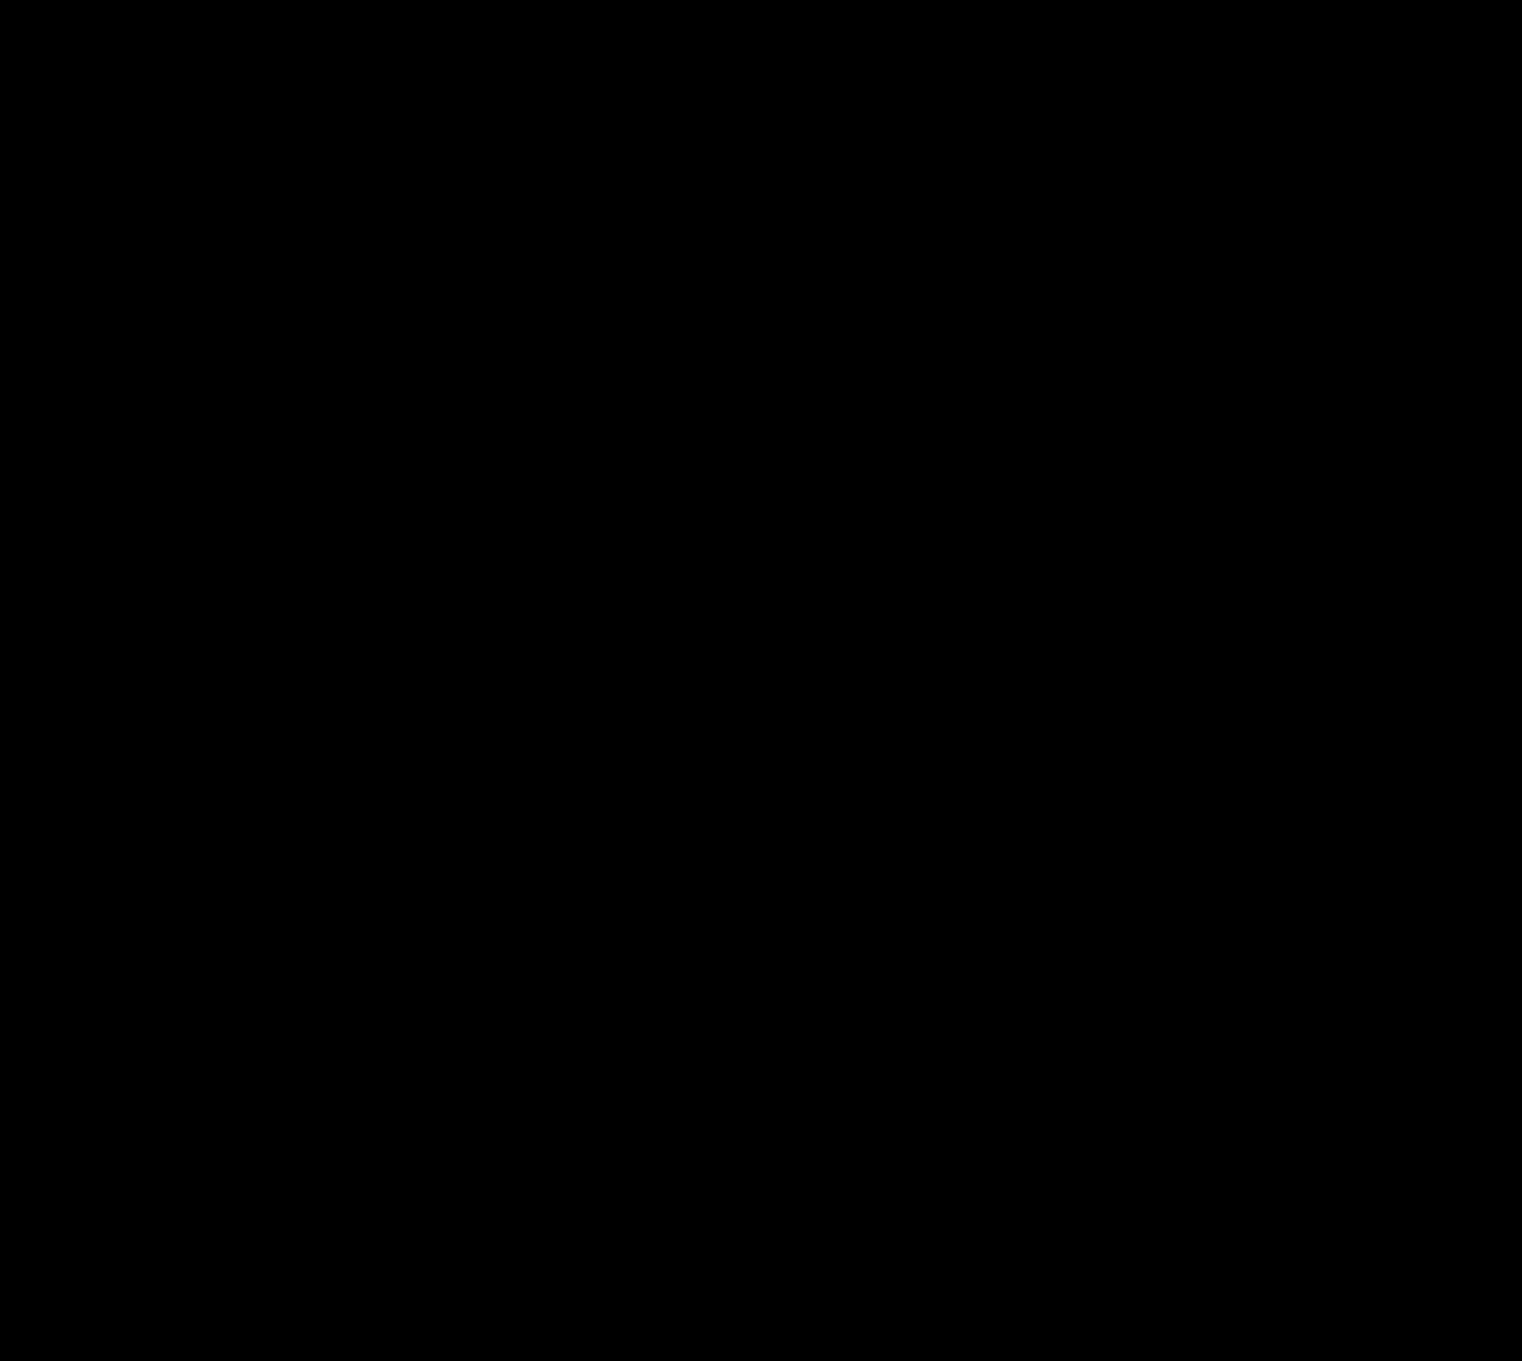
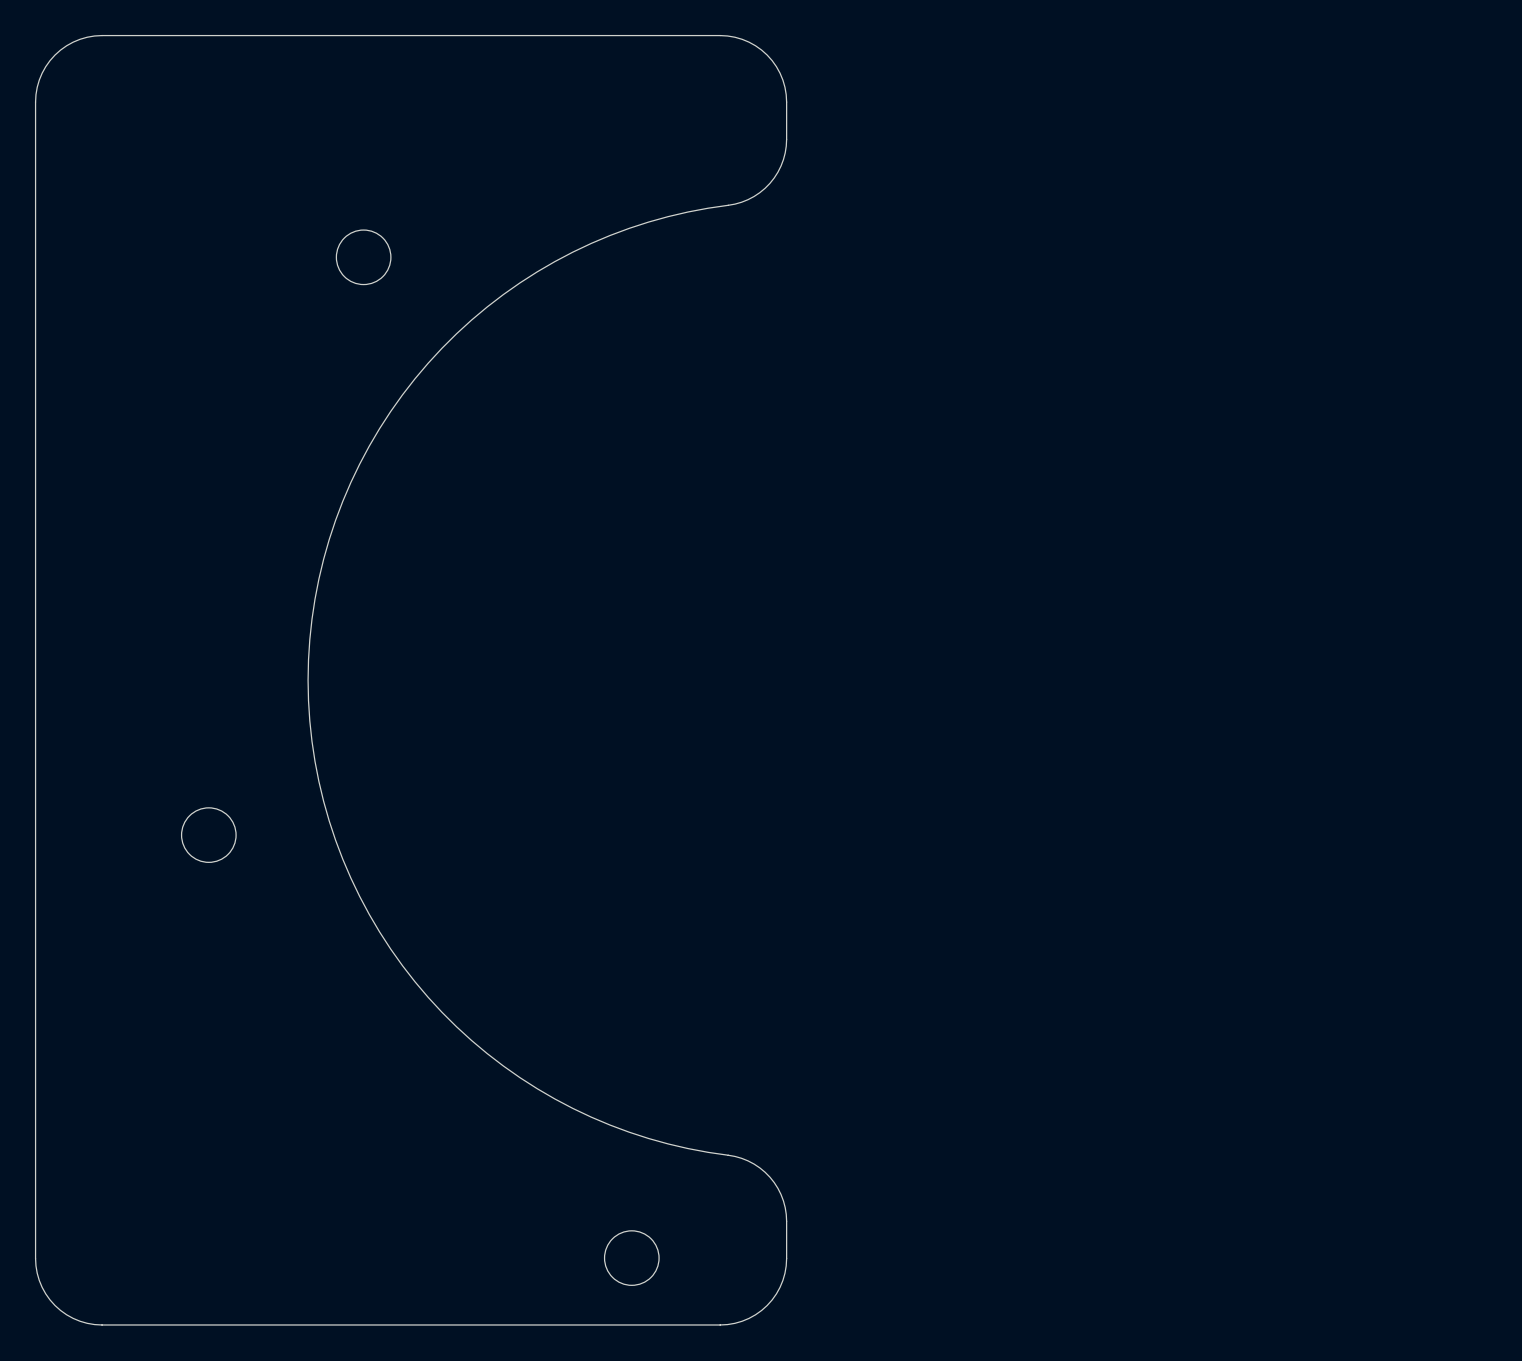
board edge: none -> (720, 35) (102, 35) (87, 37) (66, 45) (55, 55) (42, 73) (37, 87) (35, 102) (35, 1258) (39, 1280) (45, 1293) (60, 1310) (73, 1318) (87, 1323) (102, 1324) (720, 1324) (734, 1323) (755, 1314) (767, 1305) (780, 1287) (786, 1265) (786, 1214) (777, 1188) (765, 1172) (741, 1158) (688, 1148) (629, 1132) (591, 1117) (554, 1098) (520, 1077) (487, 1053) (442, 1012) (415, 981) (390, 949) (369, 914) (350, 878) (335, 840) (318, 781) (311, 741) (308, 700) (308, 659) (315, 599) (323, 559) (335, 520) (350, 482) (369, 446) (402, 394) (428, 363) (456, 333) (487, 307) (520, 282) (554, 261) (591, 243) (648, 222) (748, 199) (765, 188) (777, 172) (785, 152) (786, 139) (786, 94) (780, 73) (772, 60) (755, 45) (734, 37) (720, 35)
round board edge: none -> [336, 230, 391, 285]
round board edge: none -> [181, 807, 237, 863]
round board edge: none -> [604, 1230, 660, 1286]

